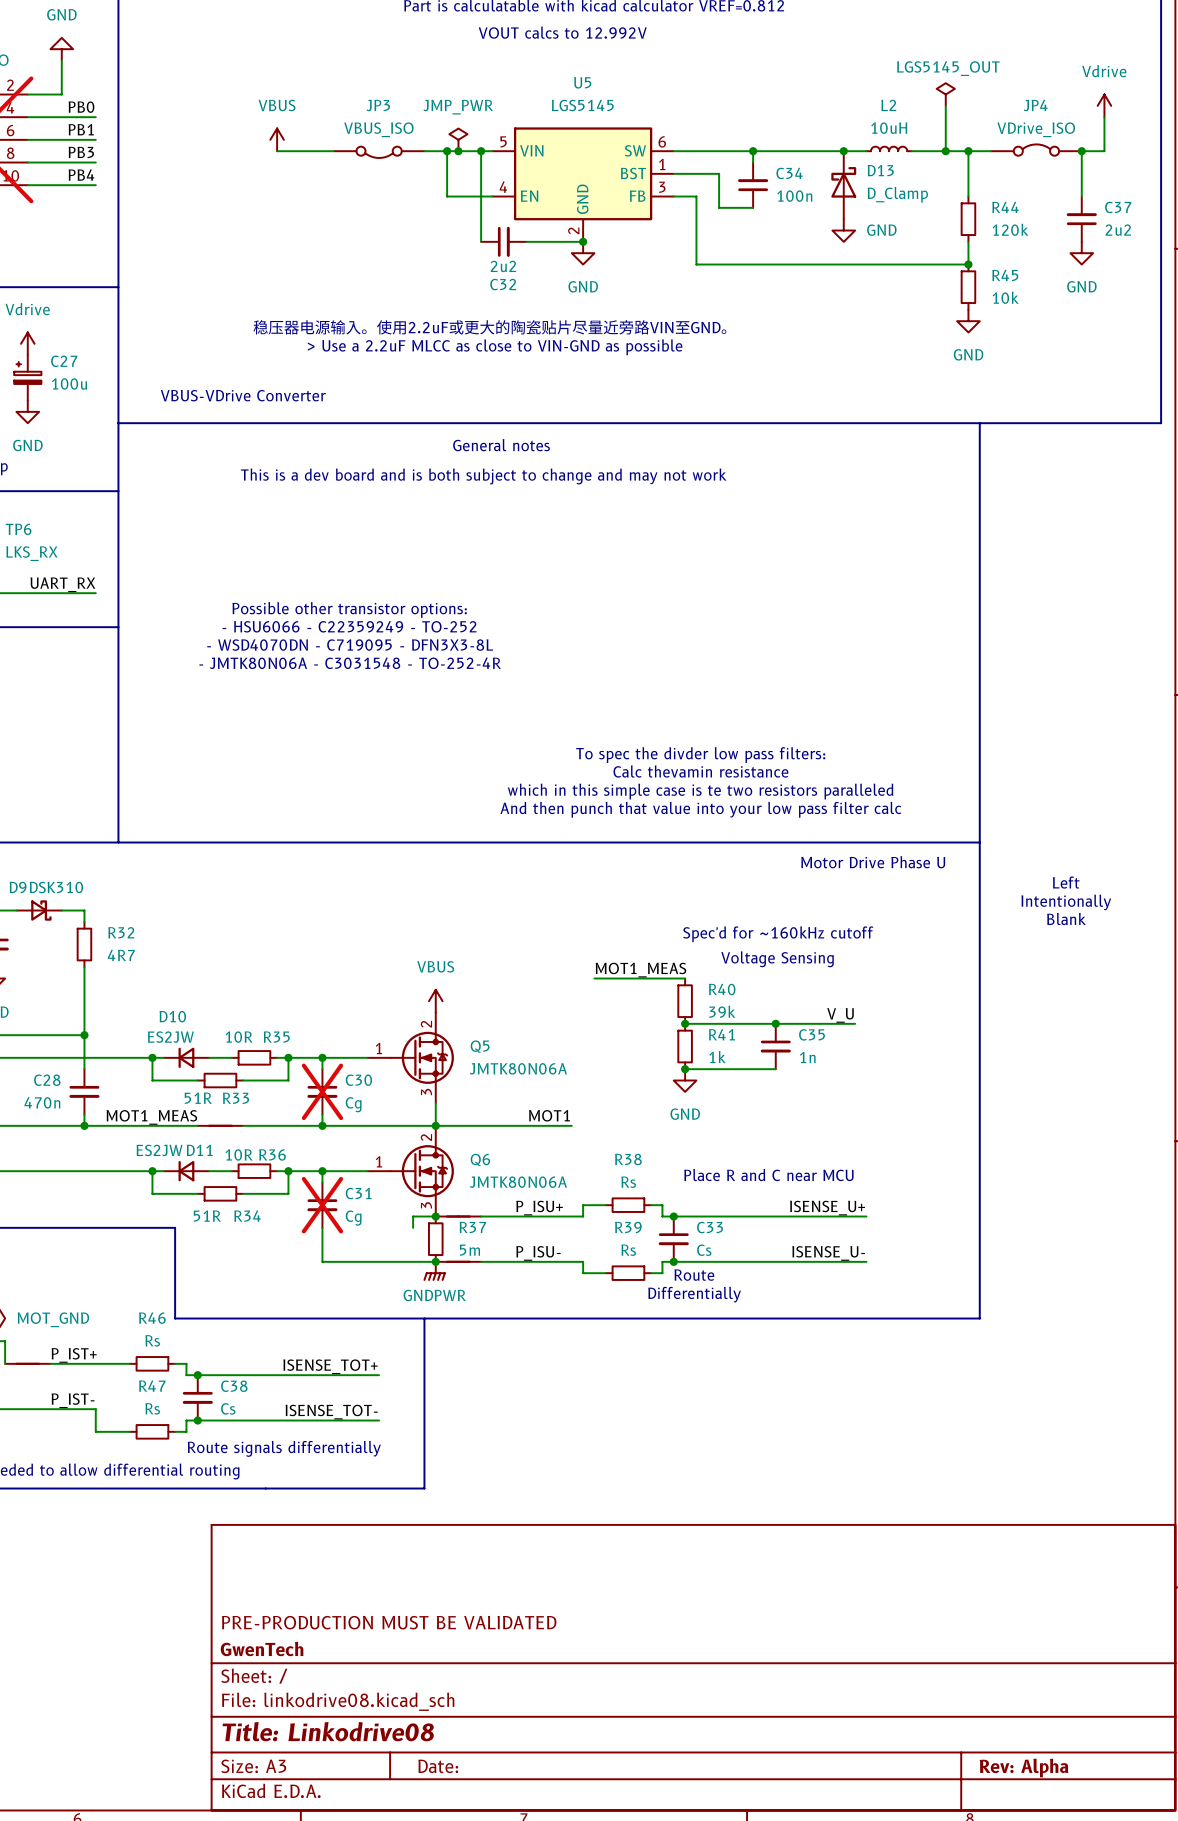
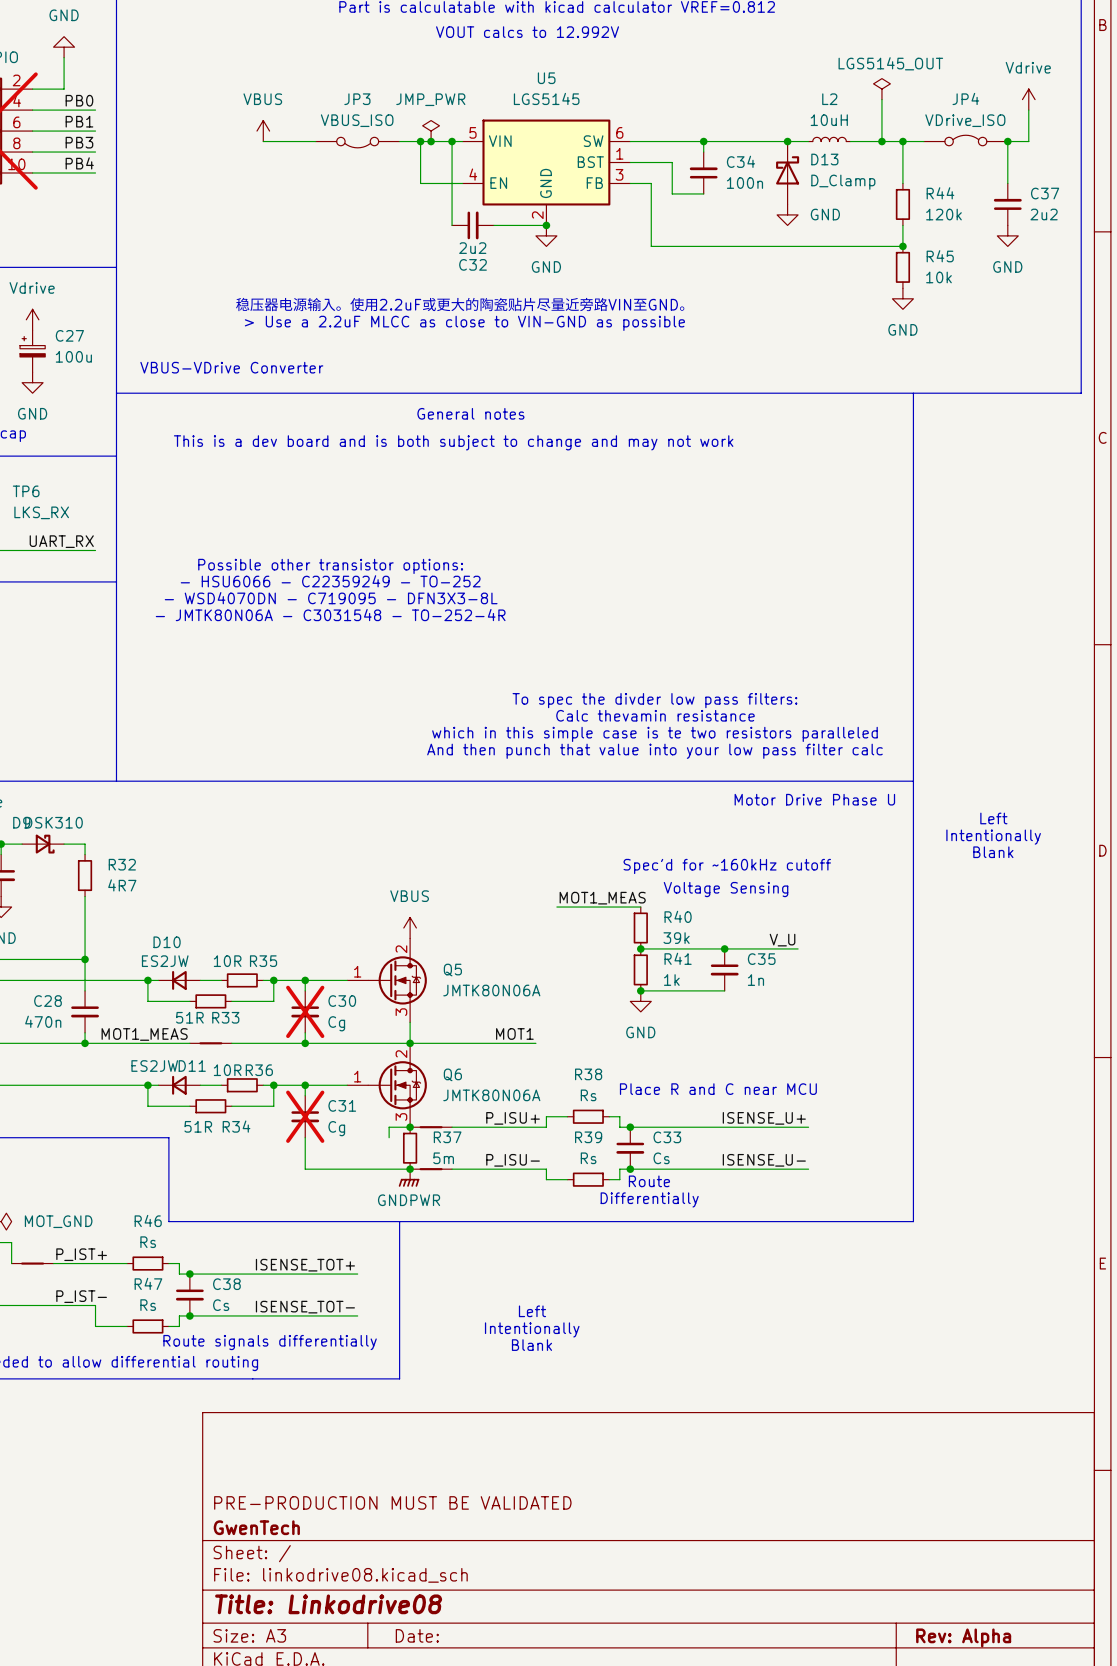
text: none -> Left (532, 1311)
text: none -> Intentionally (532, 1329)
text: none -> Blank (531, 1345)

